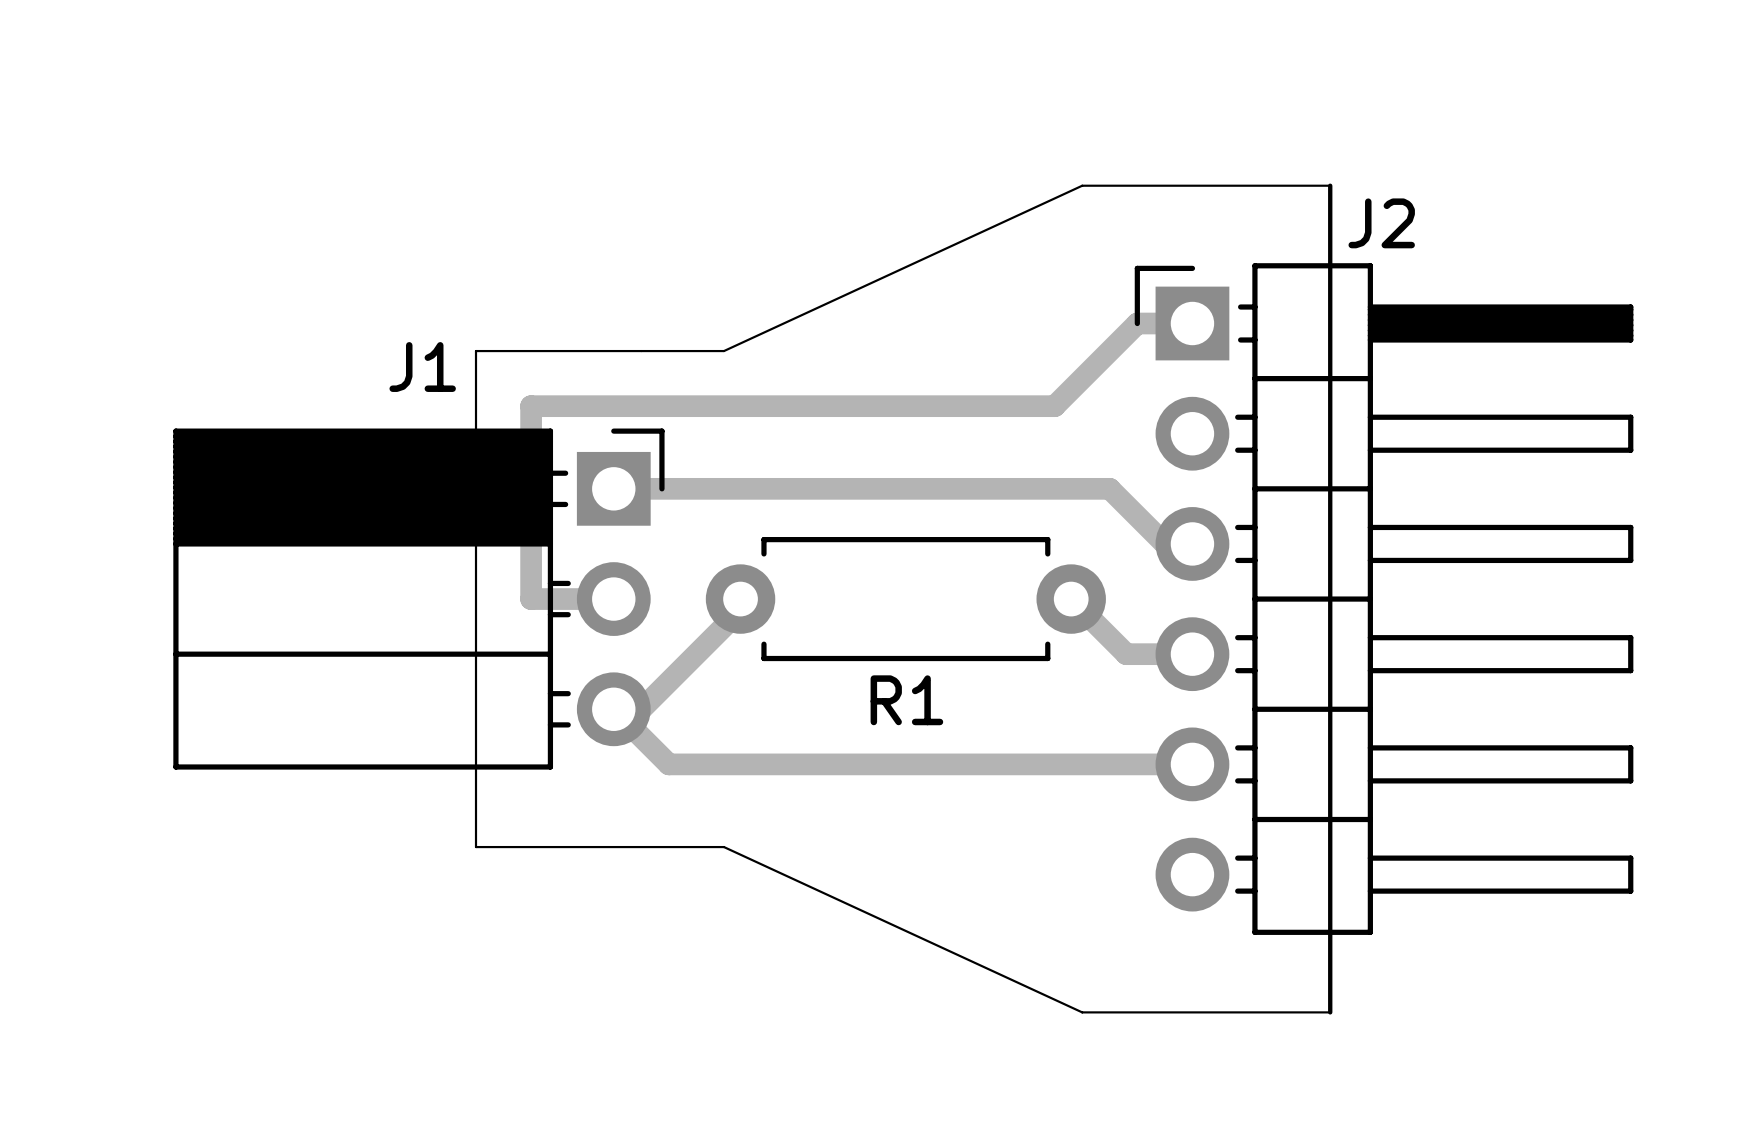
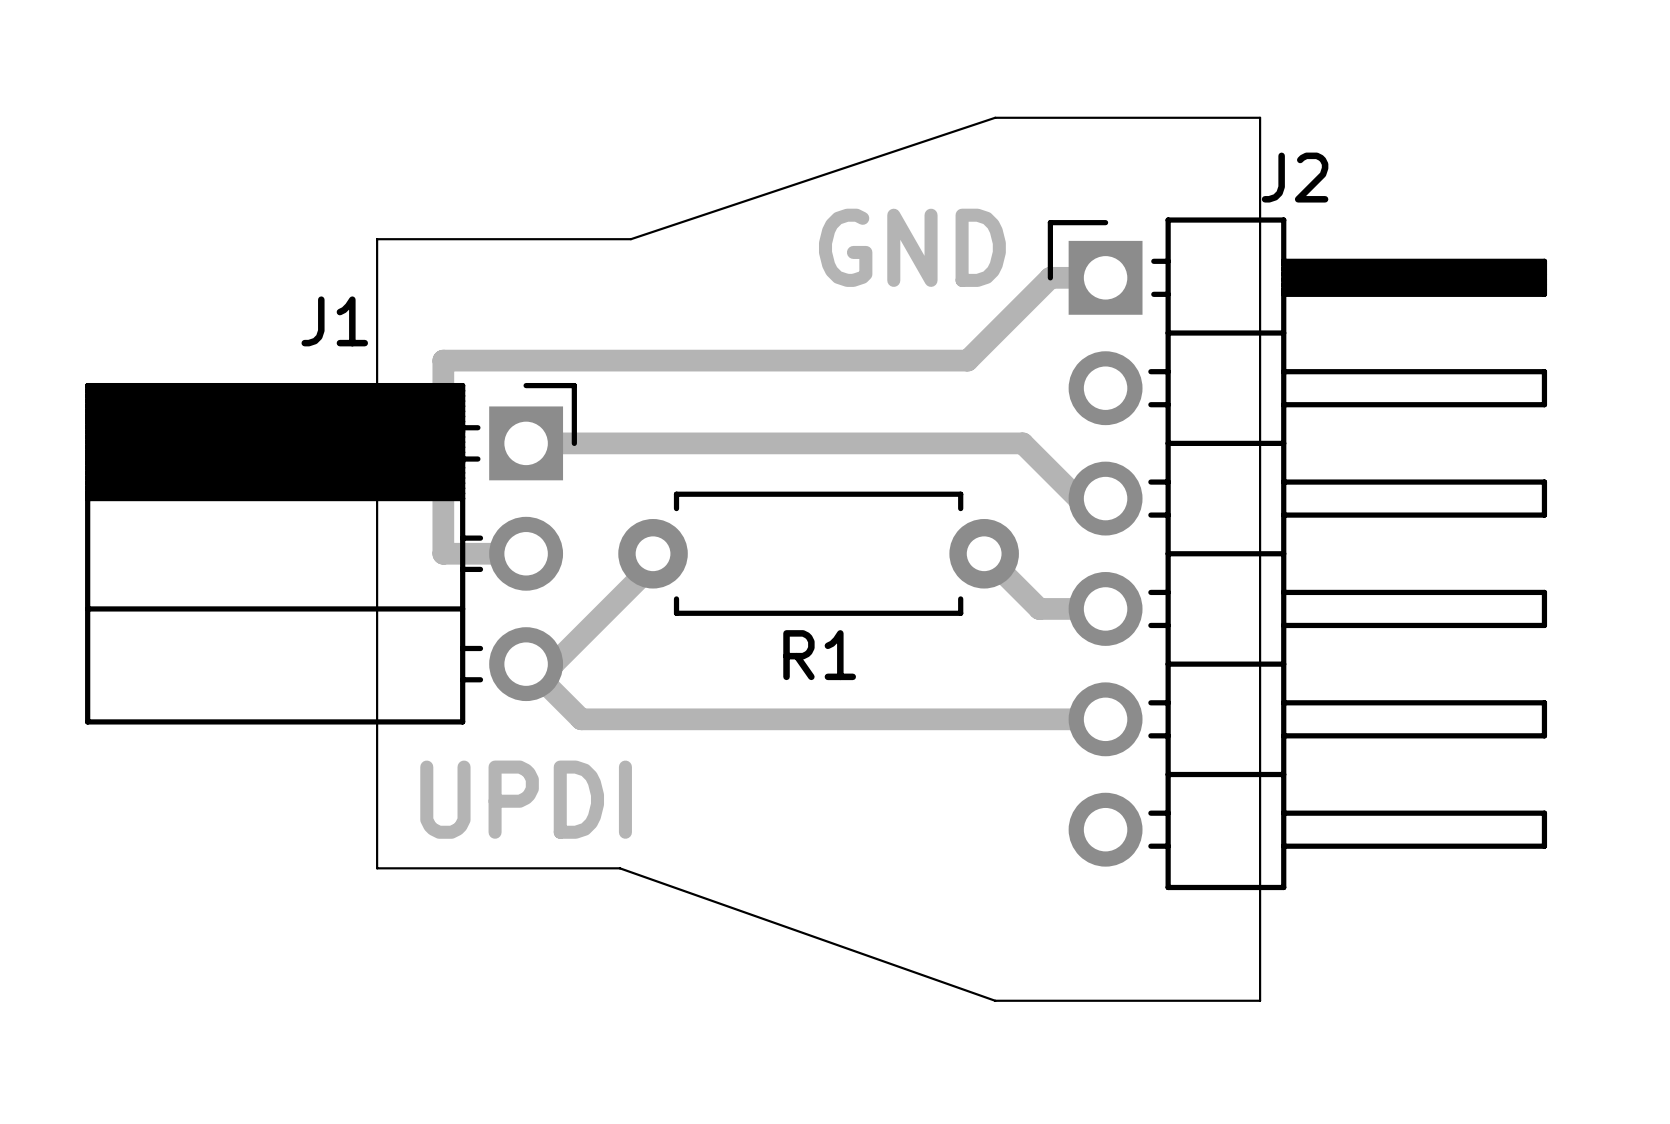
board edge: (1082, 185) (724, 351) (476, 351) (476, 847) (724, 847) (1082, 1012) (1330, 1012) (1330, 185) (1082, 185) -> (995, 117) (630, 239) (377, 239) (377, 868) (619, 868) (995, 1000) (1260, 1000) (1260, 117) (995, 117)
text: none -> GND (912, 247)
text: none -> UPDI (526, 799)

